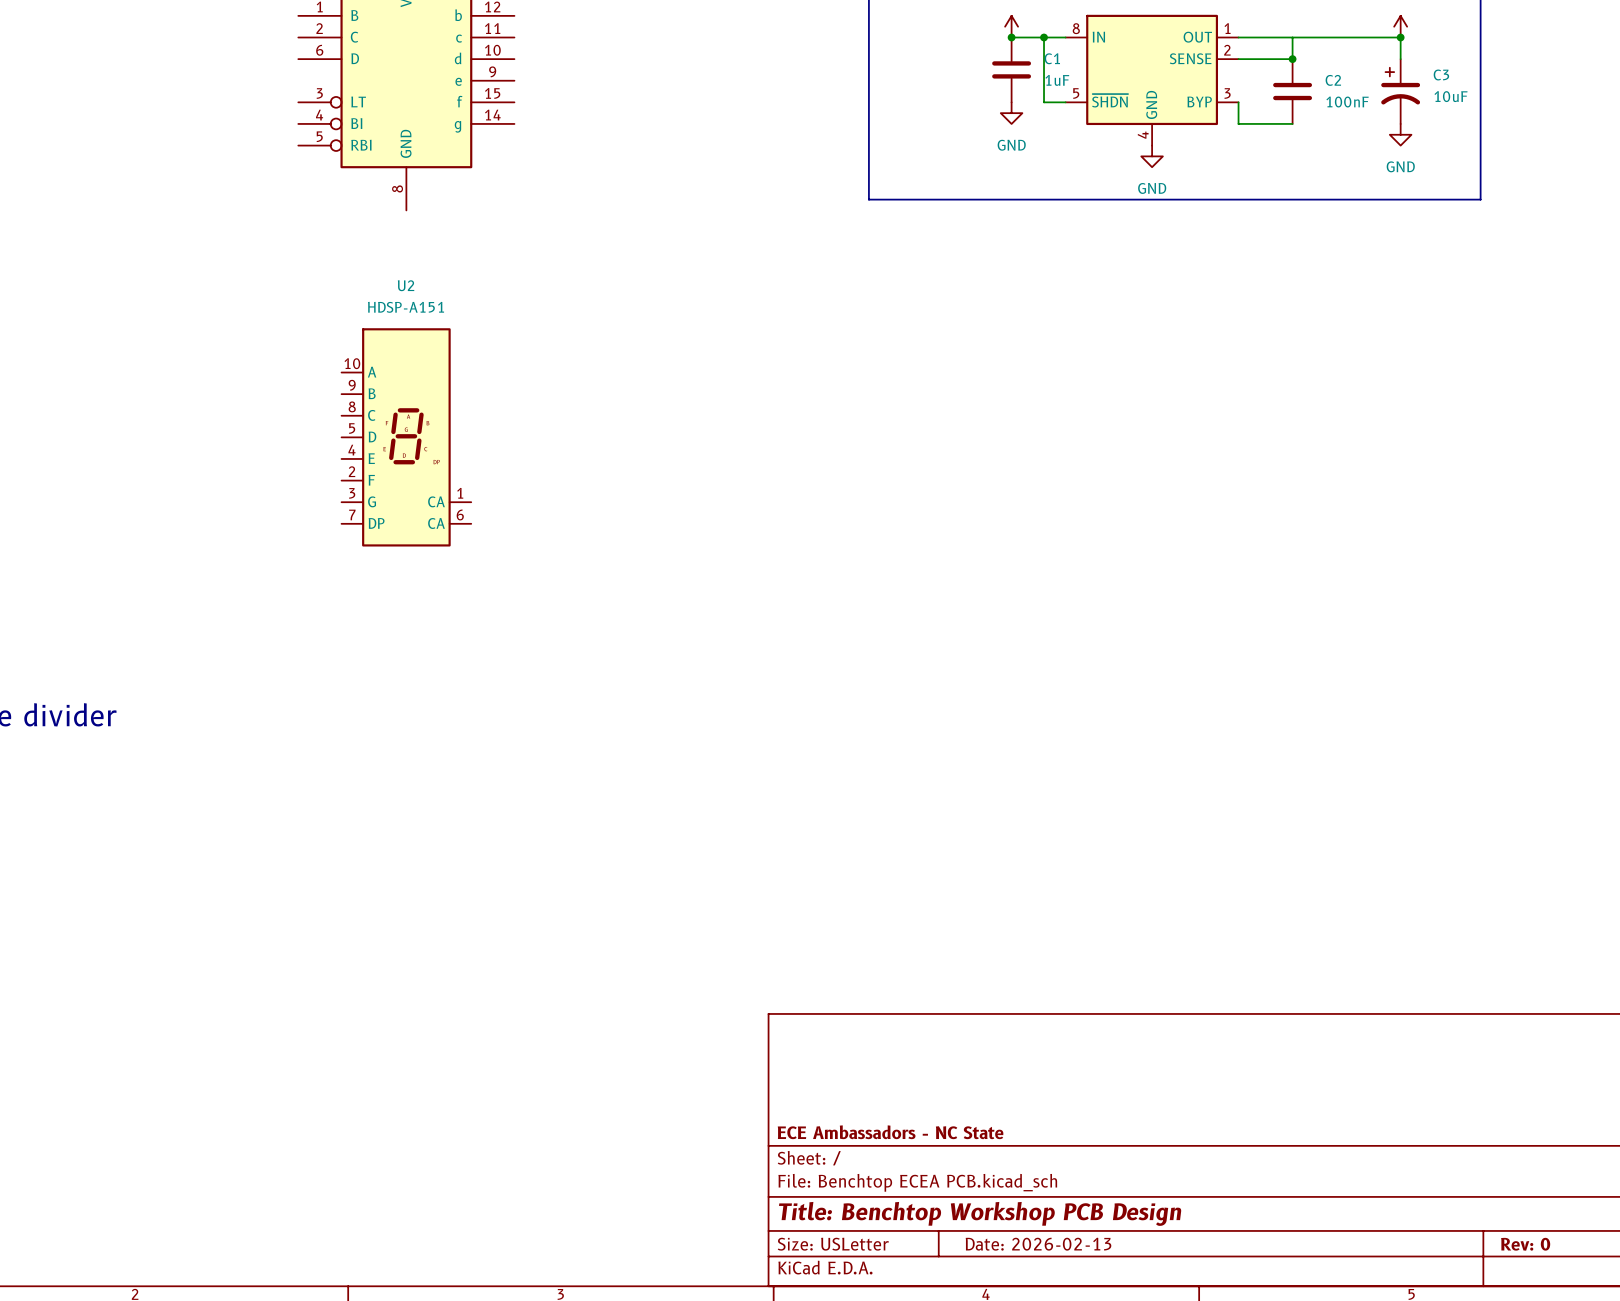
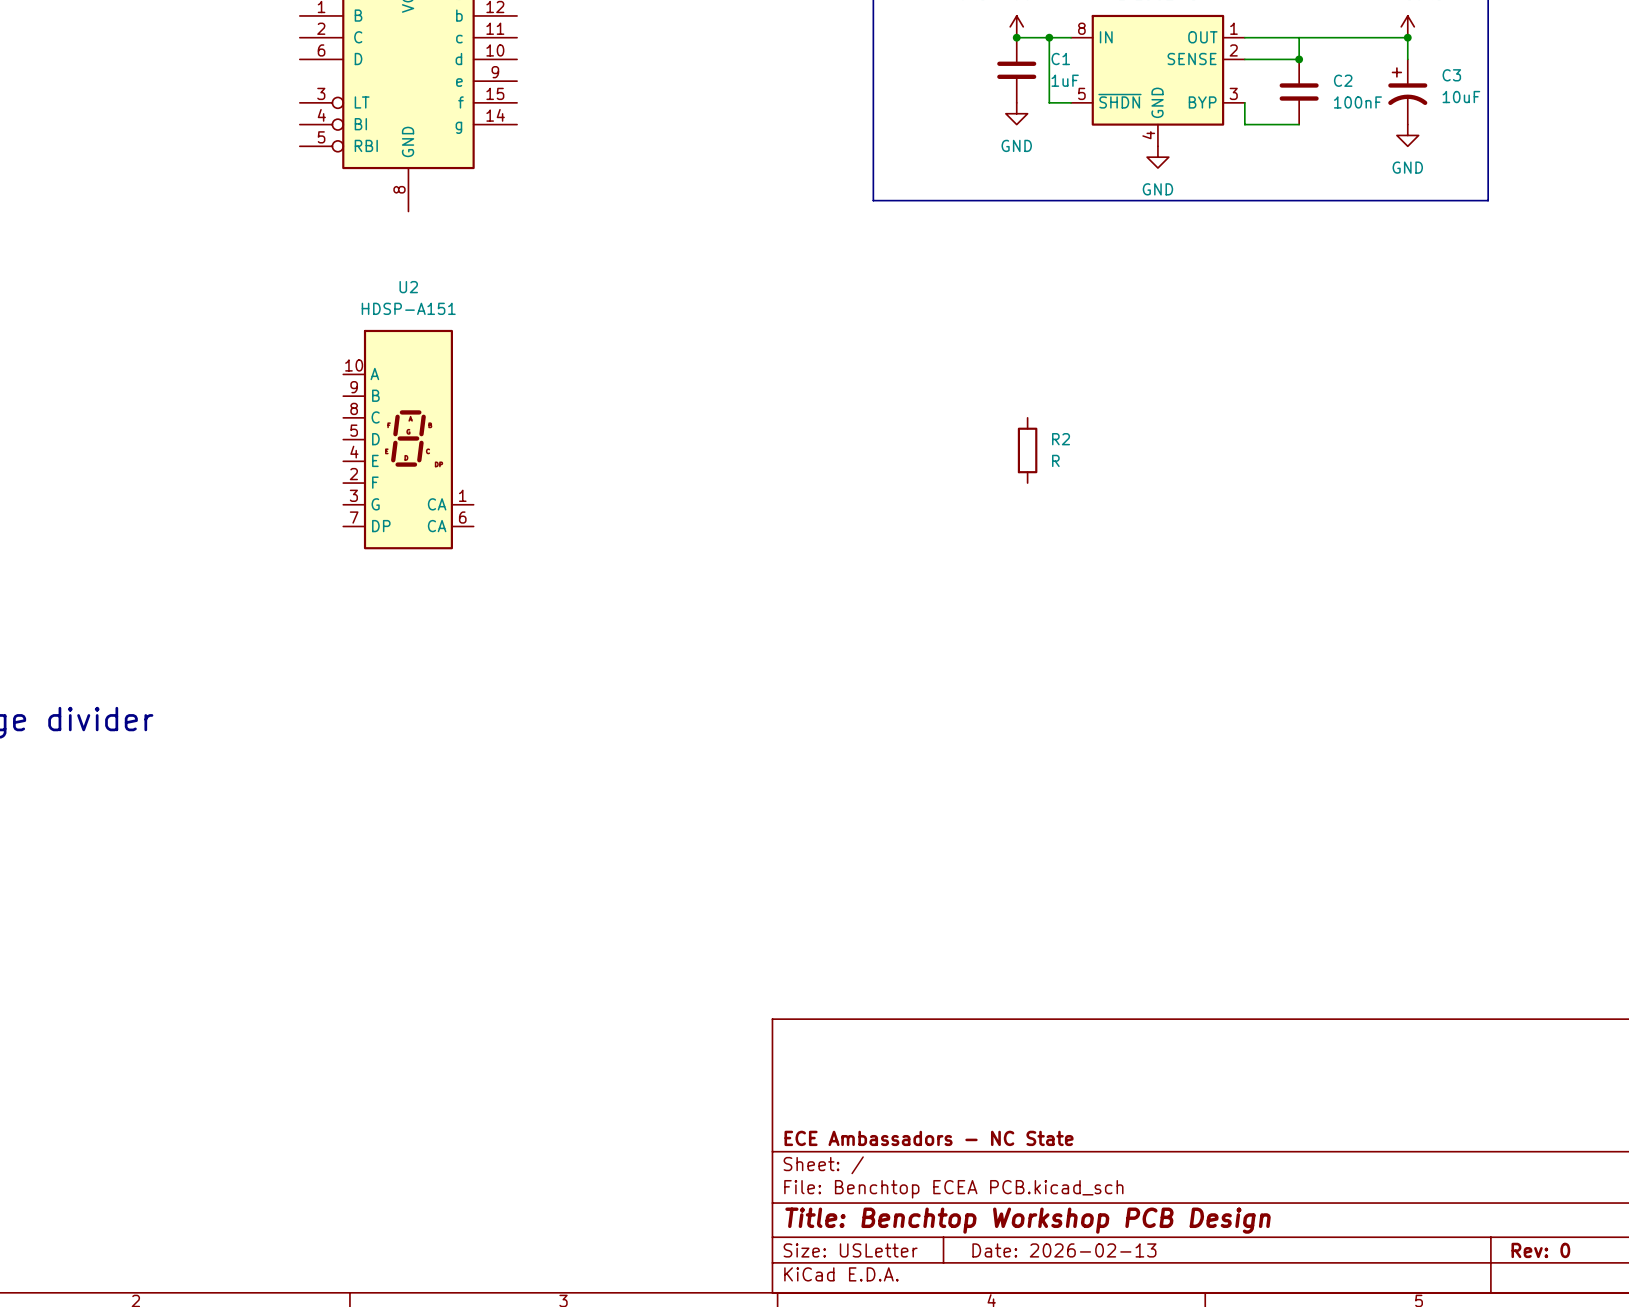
R2: none -> R (1027, 450)

